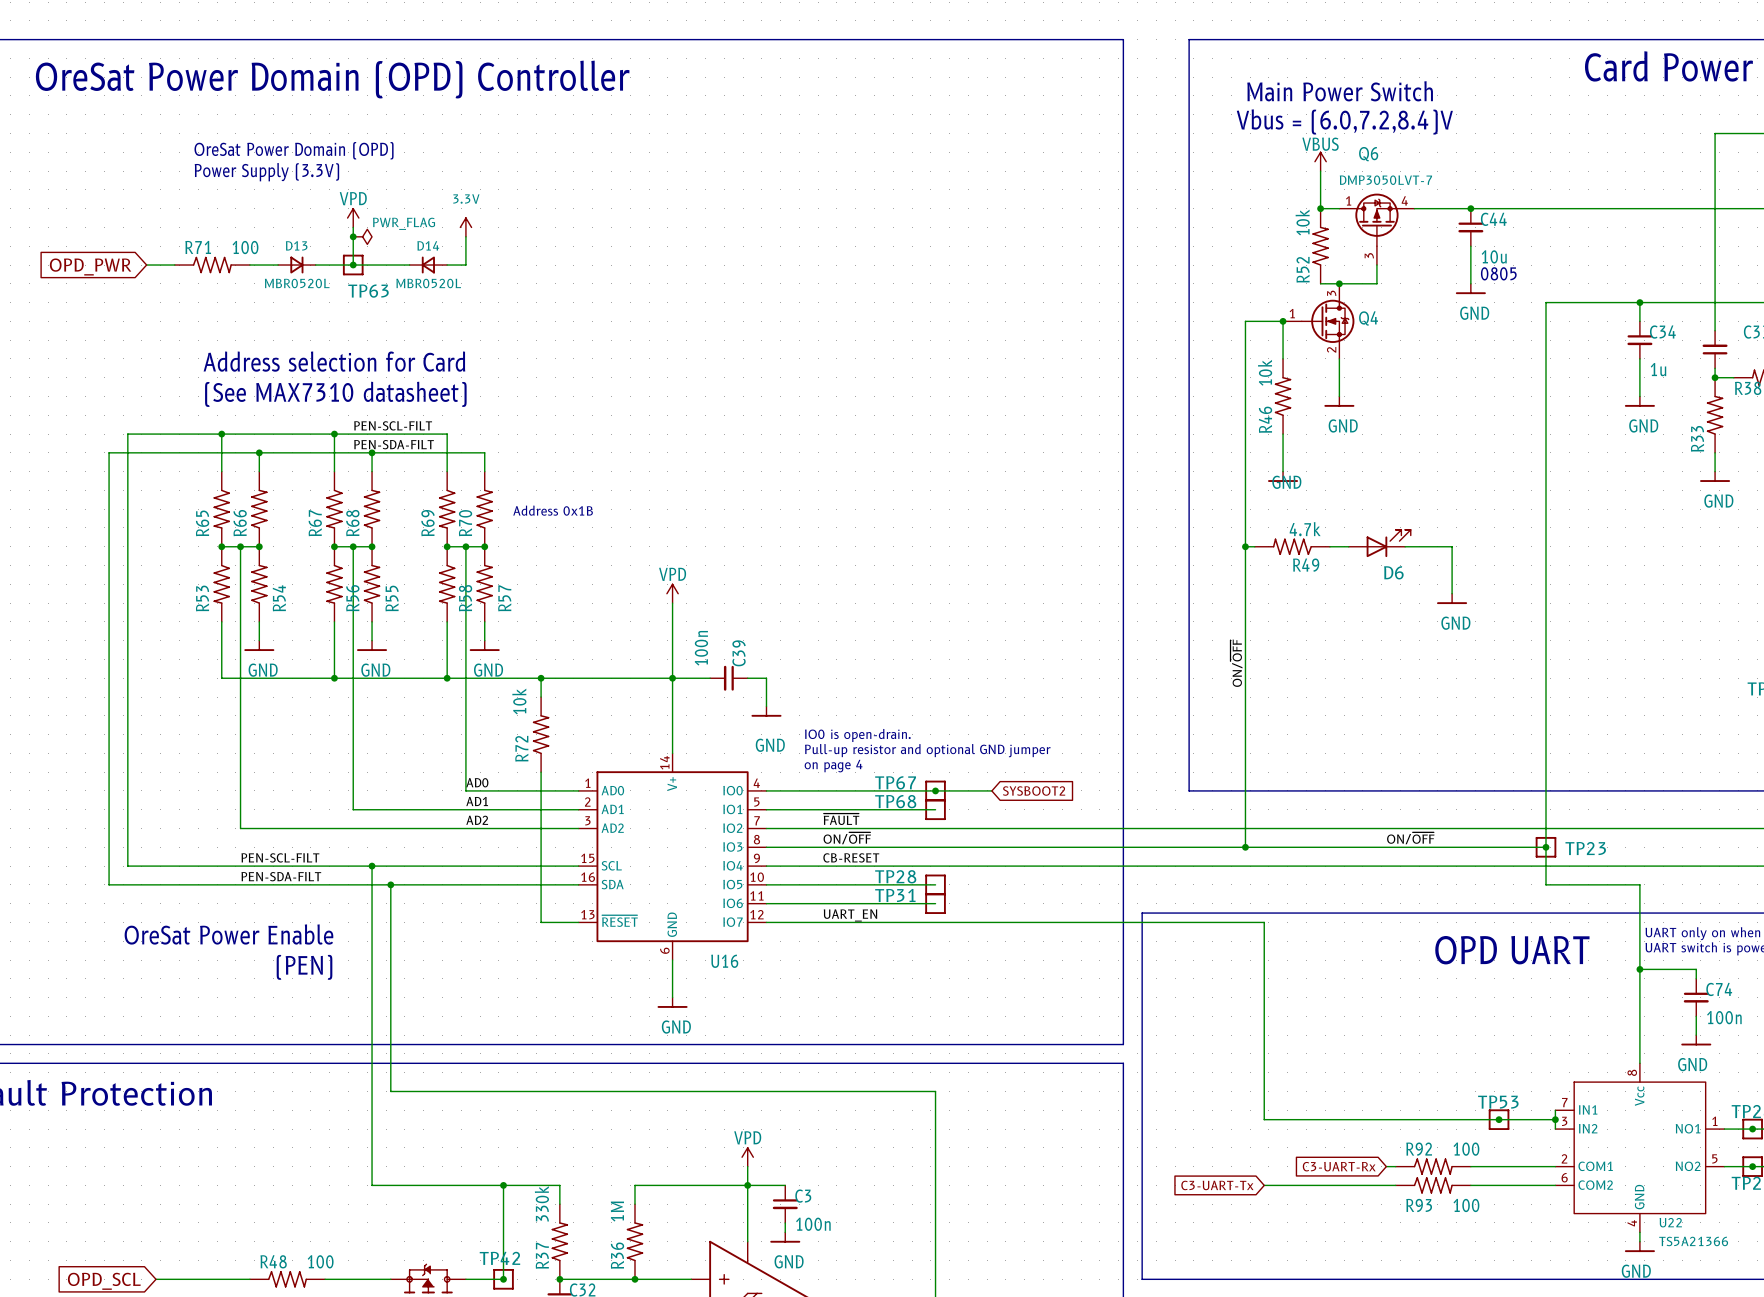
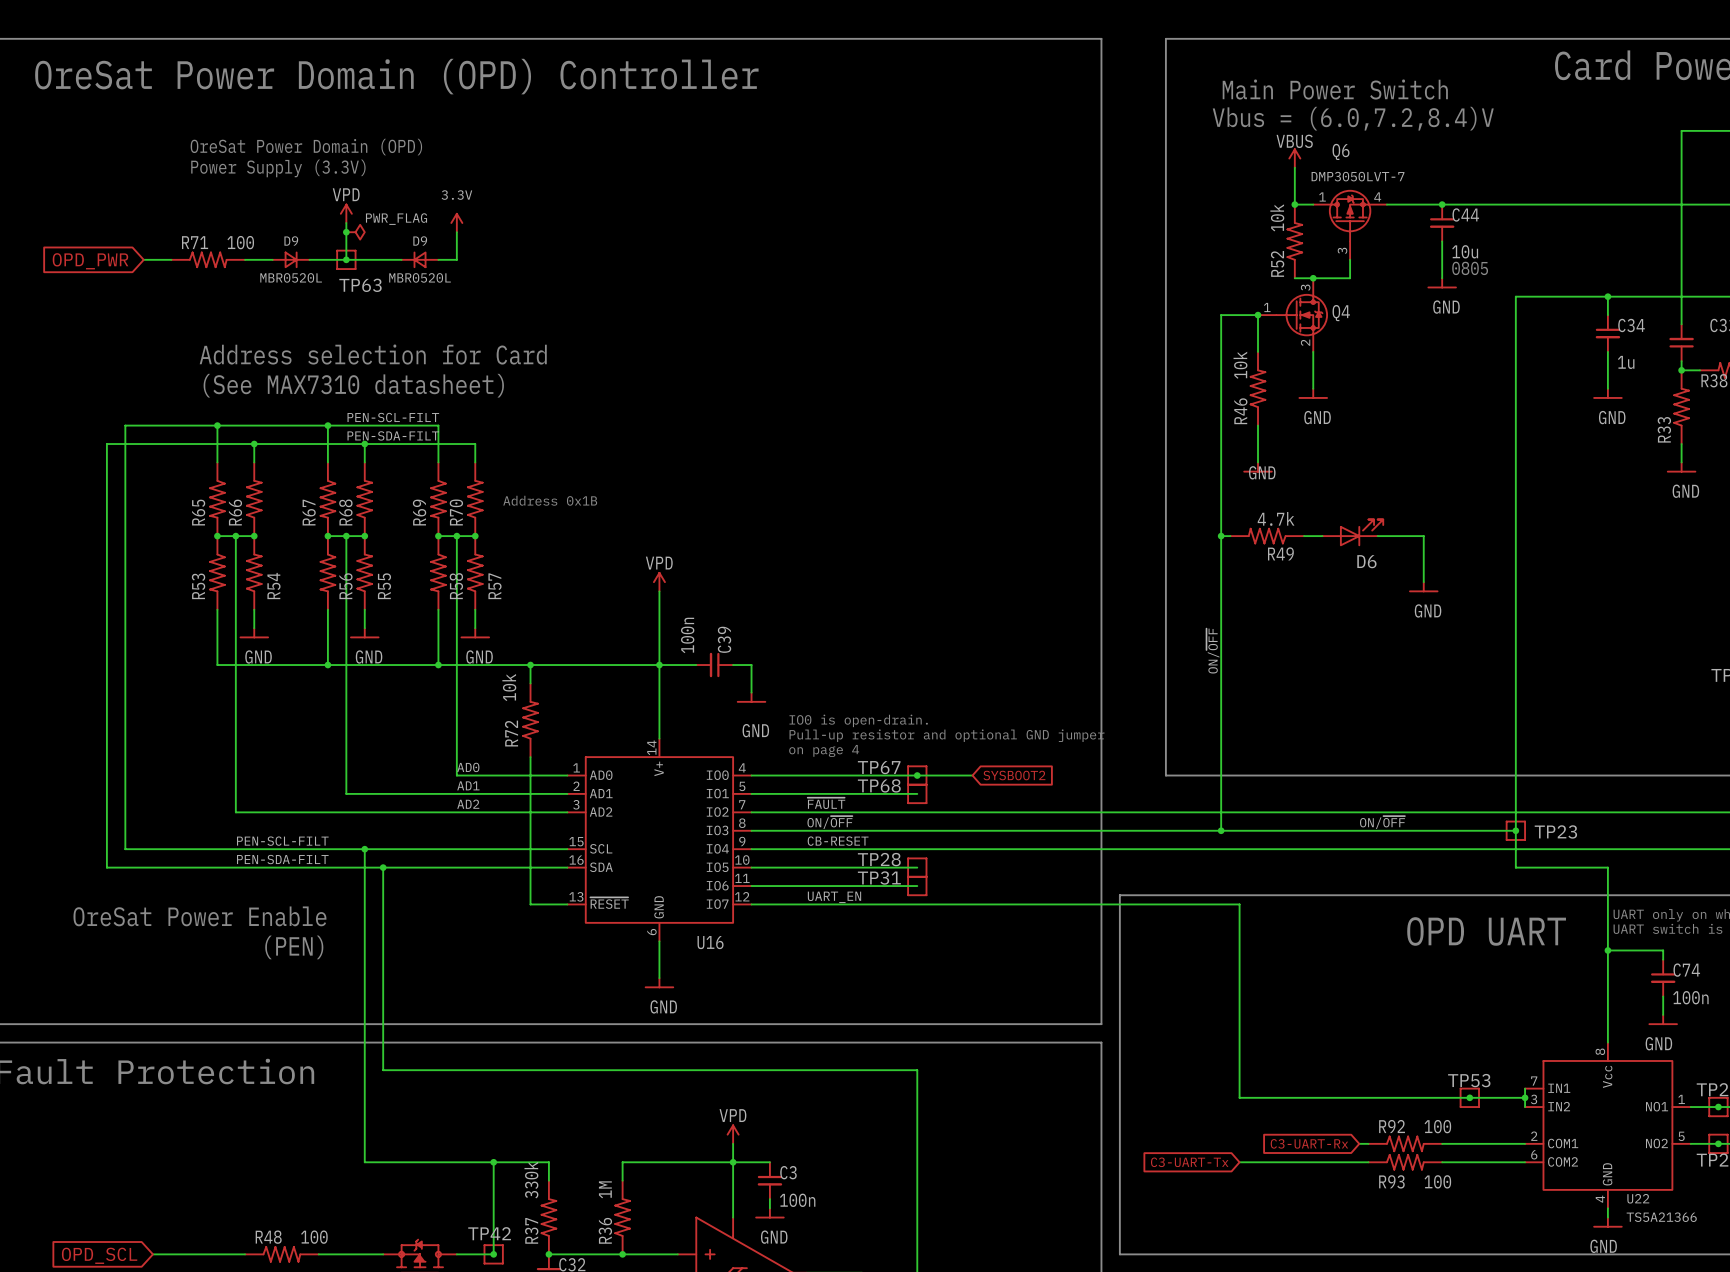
D13 name: D13 (296, 245) -> D9 (291, 241)
D14 name: D14 (428, 245) -> D9 (420, 241)

